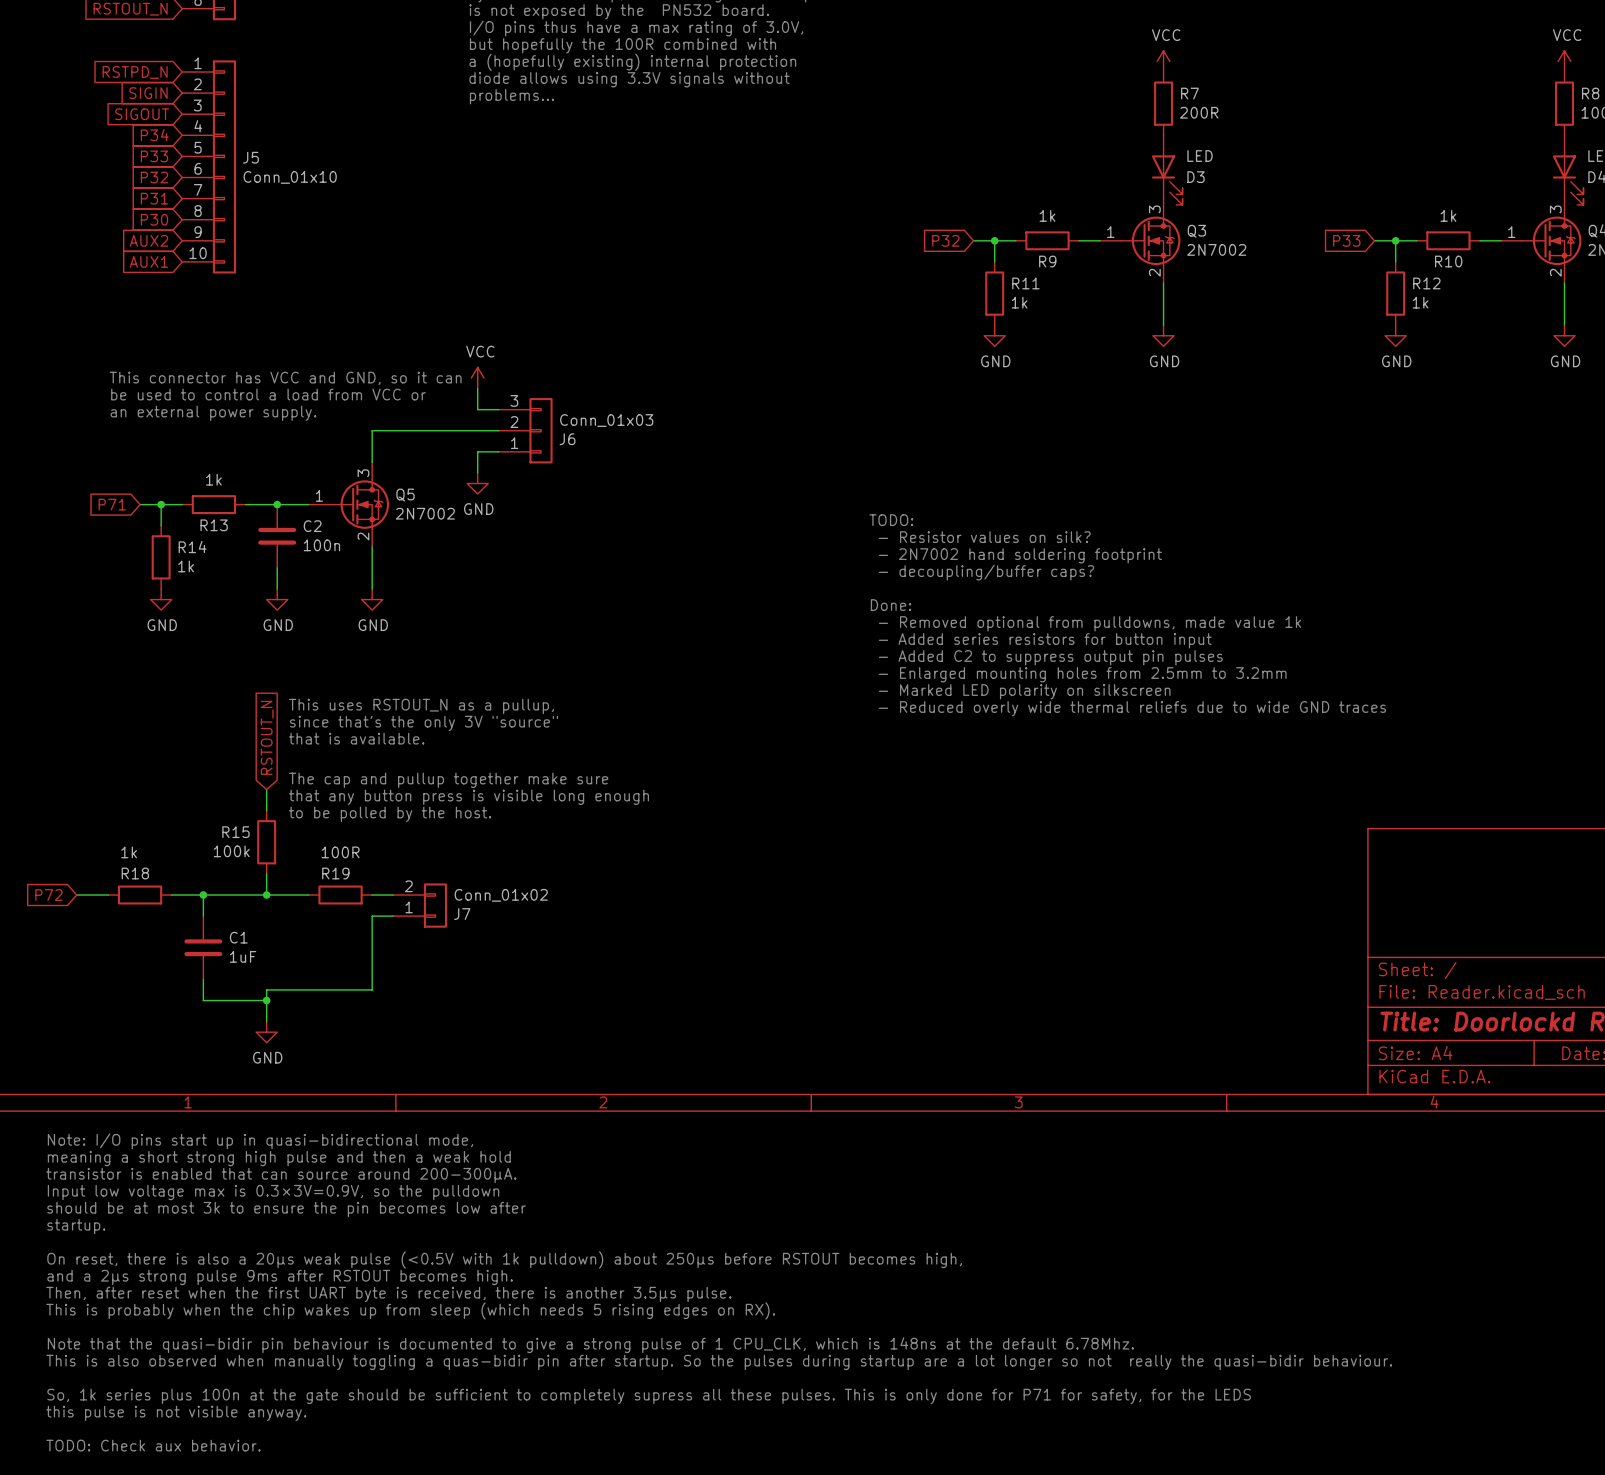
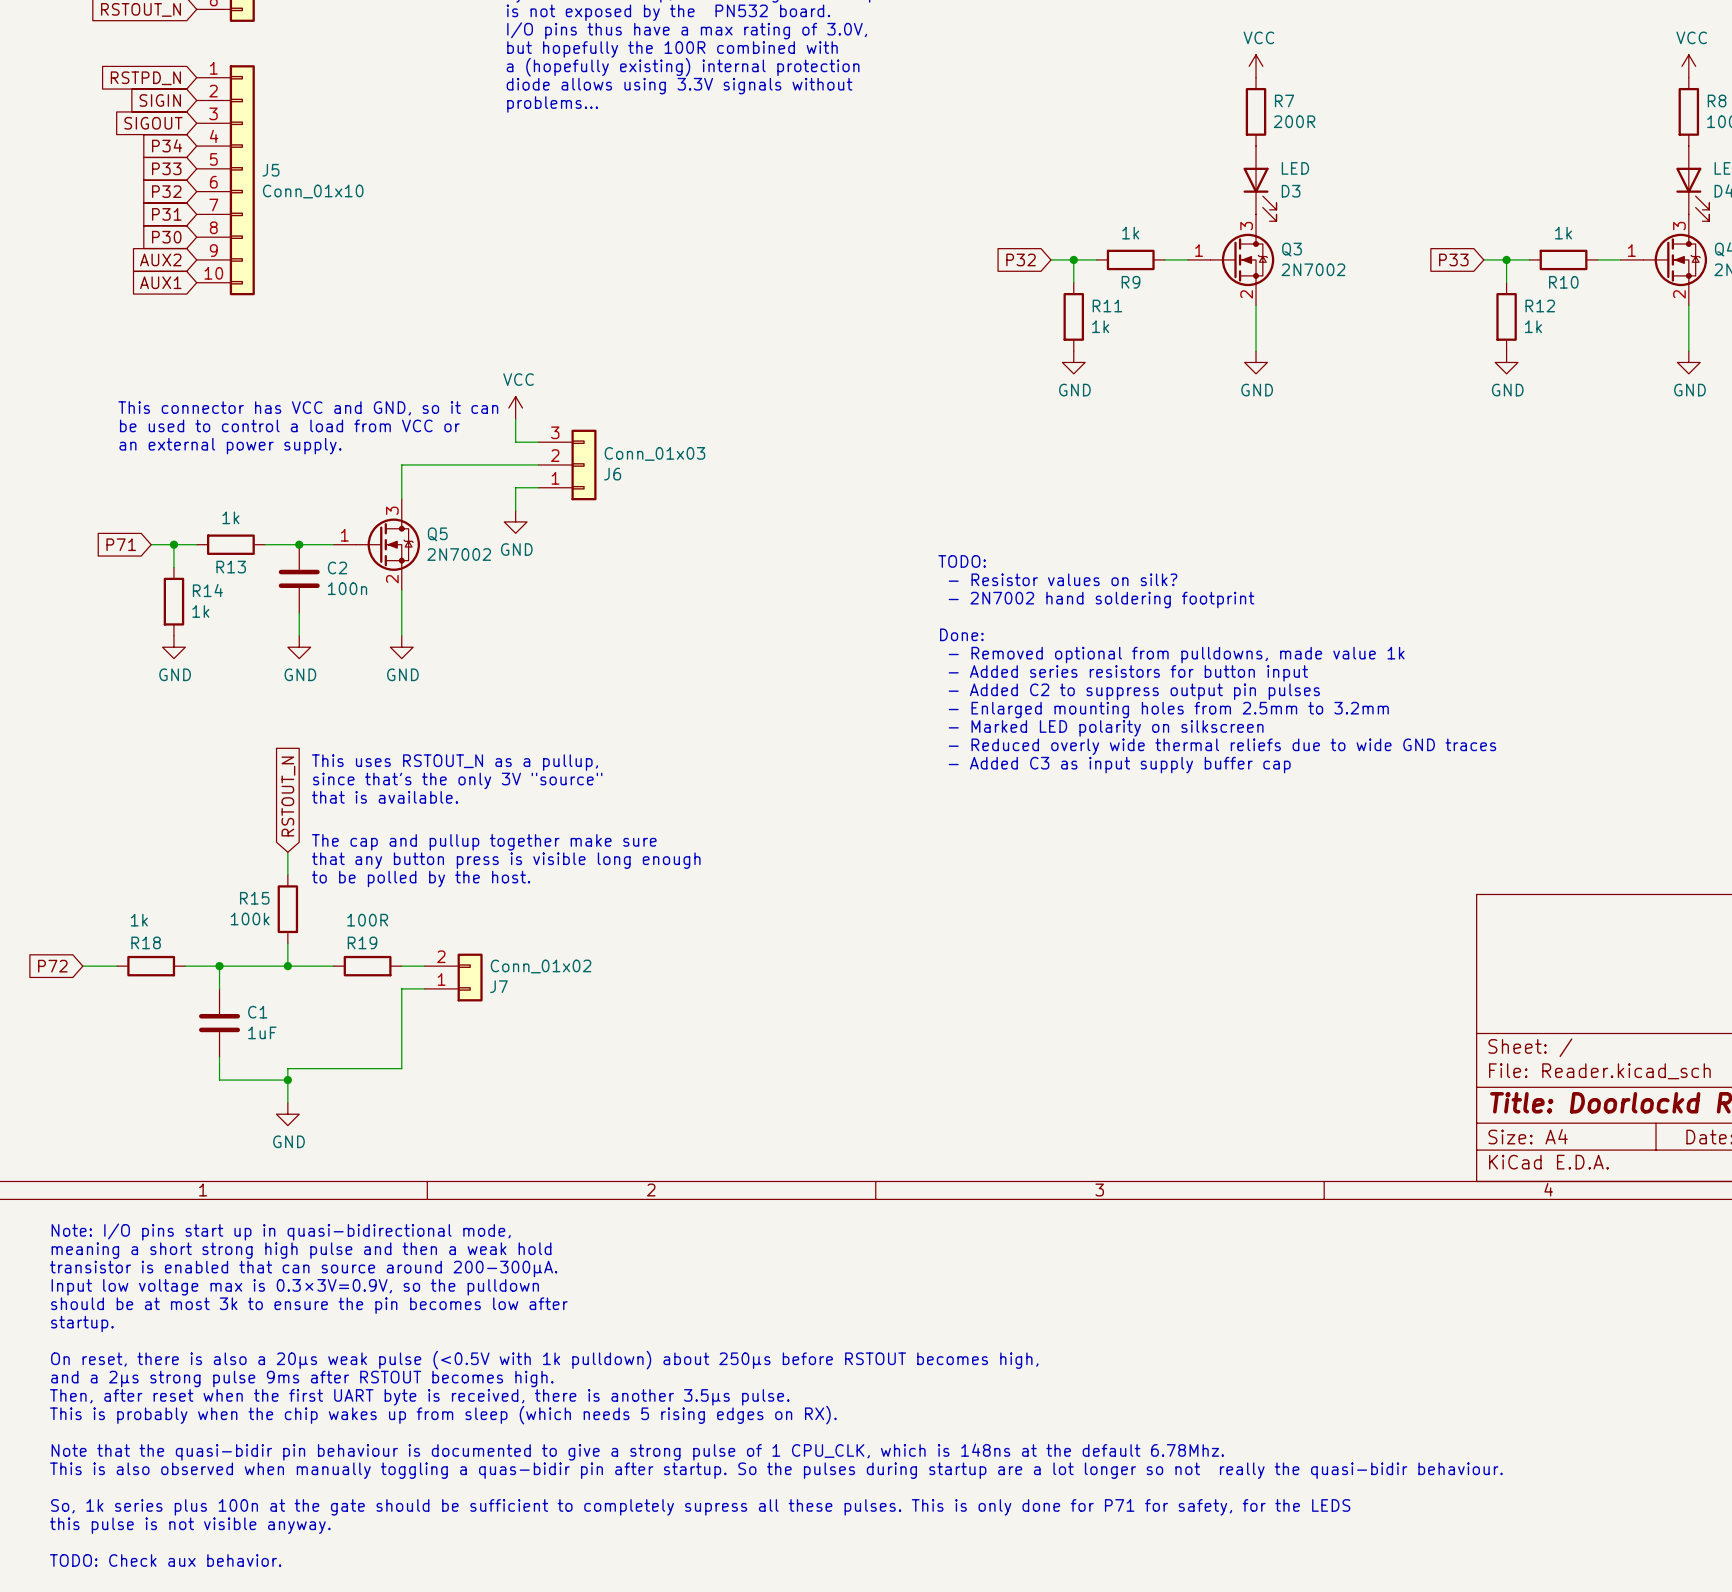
text: - decoupling/buffer caps? (986, 572) -> none
text: none -> Done: (961, 634)
text: Done: (891, 605) -> - Removed optional from pulldowns, made value 1k (1176, 655)
text: - Removed optional from pulldowns, made value 1k (1090, 623) -> - Added series resistors for button input (1128, 673)
text: - Added series resistors for button input (1045, 640) -> - Added C2 to suppress output pin pulses (1134, 691)
text: - Added C2 to suppress output pin pulses (1050, 657) -> - Enlarged mounting holes from 2.5mm to 3.2mm (1168, 710)
text: - Enlarged mounting holes from 2.5mm to 3.2mm (1082, 674) -> - Marked LED polarity on silkscreen (1106, 728)
text: - Marked LED polarity on silkscreen (1024, 691) -> - Reduced overly wide thermal reliefs due to wide GND traces (1222, 746)
text: - Reduced overly wide thermal reliefs due to wide GND traces (1132, 708) -> - Added C3 as input supply buffer cap (1119, 765)

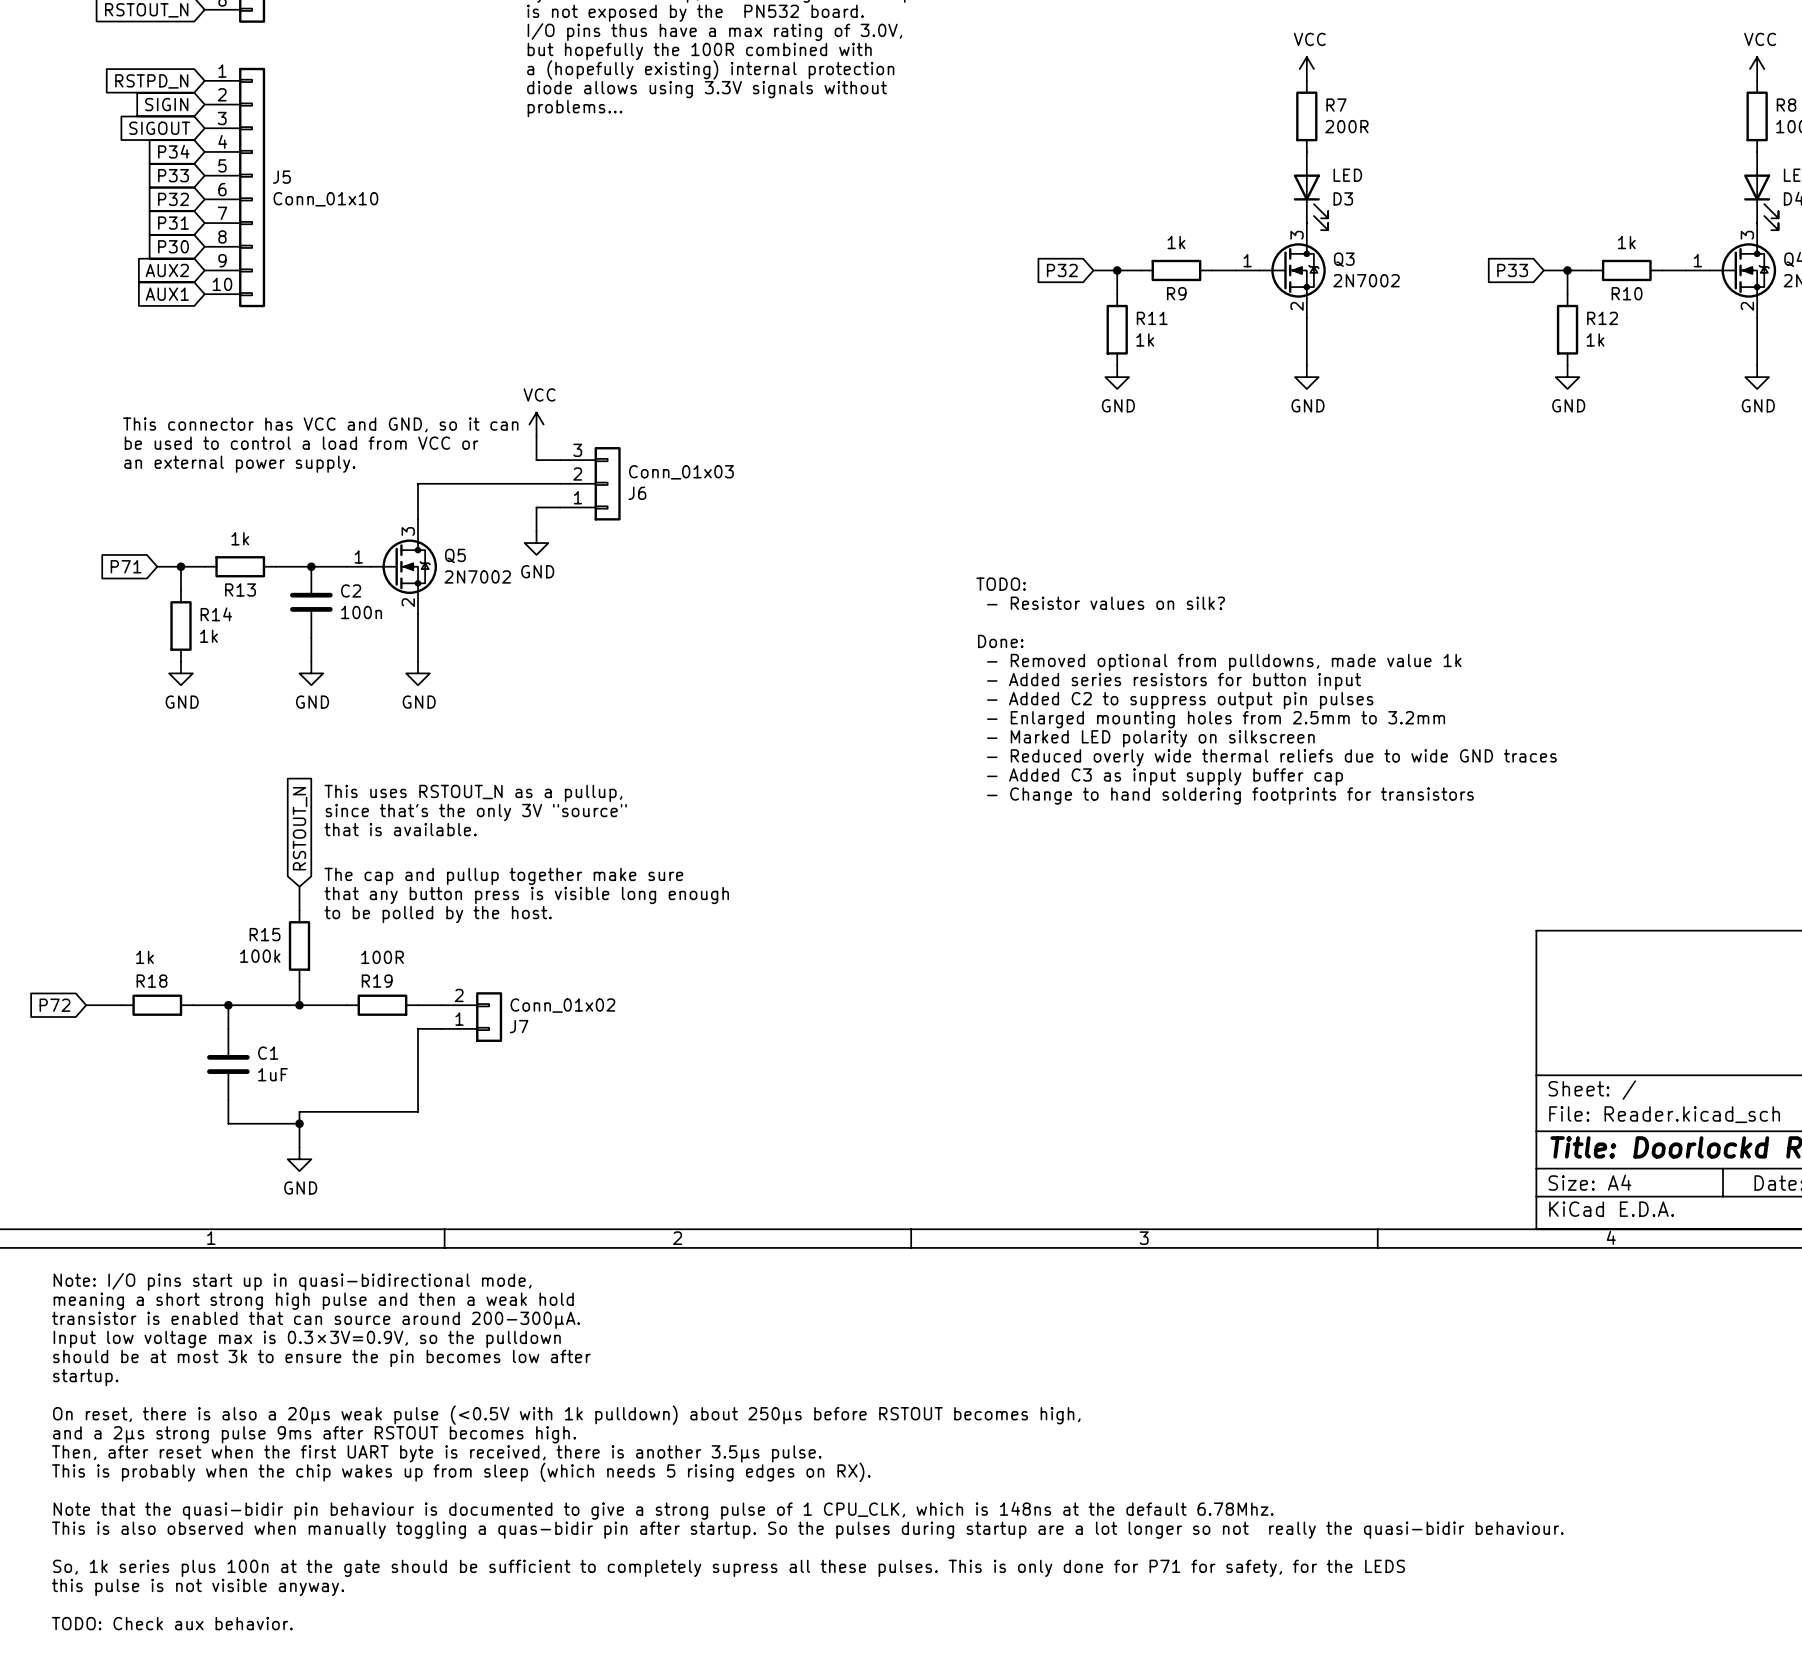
text: - 2N7002 hand soldering footprint (1101, 600) -> none
text: none -> Done: (1000, 641)
text: Done: (961, 634) -> - Removed optional from pulldowns, made value 1k (1224, 662)
text: - Removed optional from pulldowns, made value 1k (1176, 655) -> - Added series resistors for button input (1174, 681)
text: - Added series resistors for button input (1128, 673) -> - Added C2 to suppress output pin pulses (1180, 700)
text: - Added C2 to suppress output pin pulses (1134, 691) -> - Enlarged mounting holes from 2.5mm to 3.2mm (1216, 719)
text: - Enlarged mounting holes from 2.5mm to 3.2mm (1168, 710) -> - Marked LED polarity on silkscreen (1150, 738)
text: - Marked LED polarity on silkscreen (1106, 728) -> - Reduced overly wide thermal reliefs due to wide GND traces (1271, 757)
text: - Reduced overly wide thermal reliefs due to wide GND traces (1222, 746) -> - Added C3 as input supply buffer cap (1164, 776)
text: - Added C3 as input supply buffer cap (1119, 765) -> - Change to hand soldering footprints for transistors (1230, 796)

